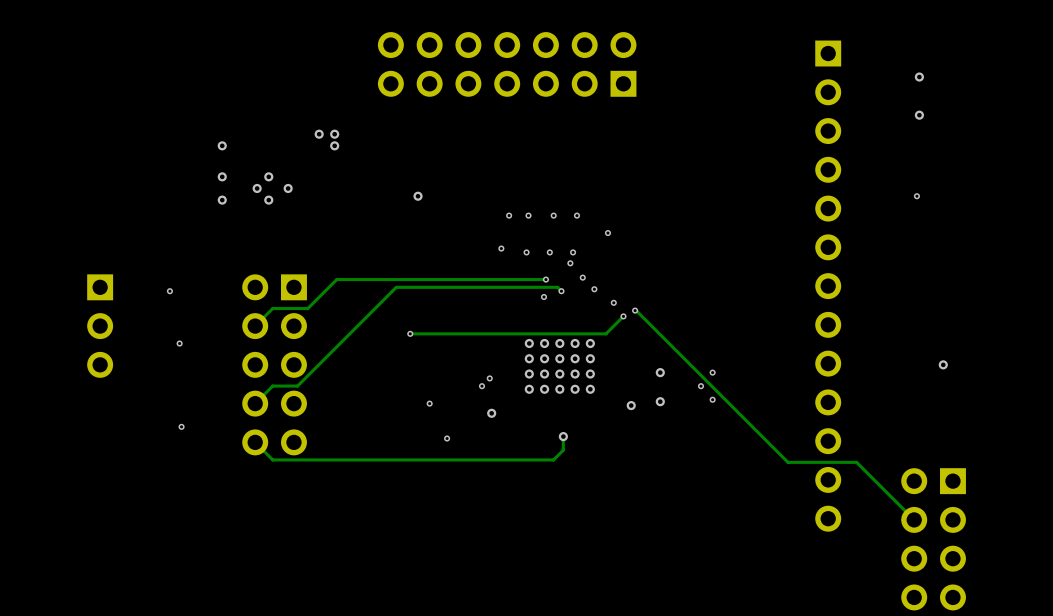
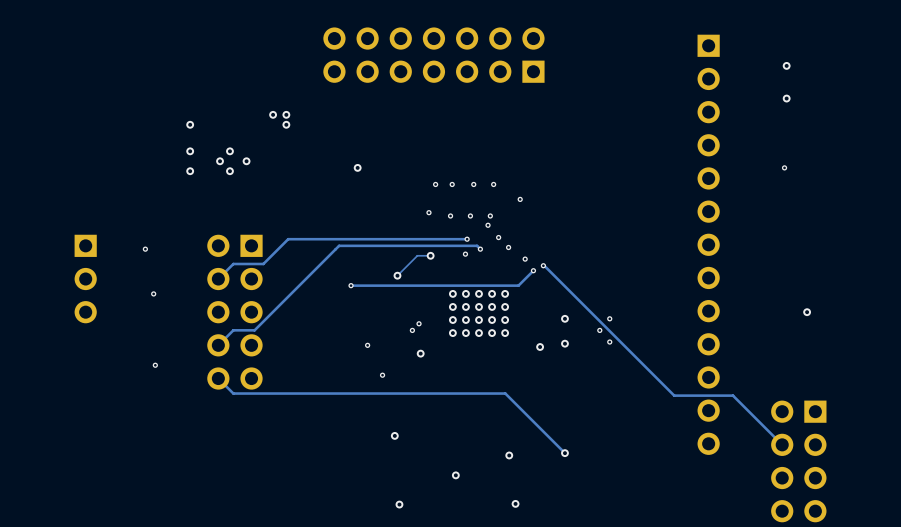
track: none -> (430, 255) (417, 255) (397, 275)
via: none -> (430, 255)
via: none -> (397, 275)
track: (563, 436) (563, 450) (553, 459) -> (564, 453) (505, 393) (473, 393)
via: (563, 436) -> none
via: none -> (394, 435)
via: none -> (564, 453)
via: none -> (509, 455)
via: none -> (455, 475)
via: none -> (515, 503)
via: none -> (399, 504)

